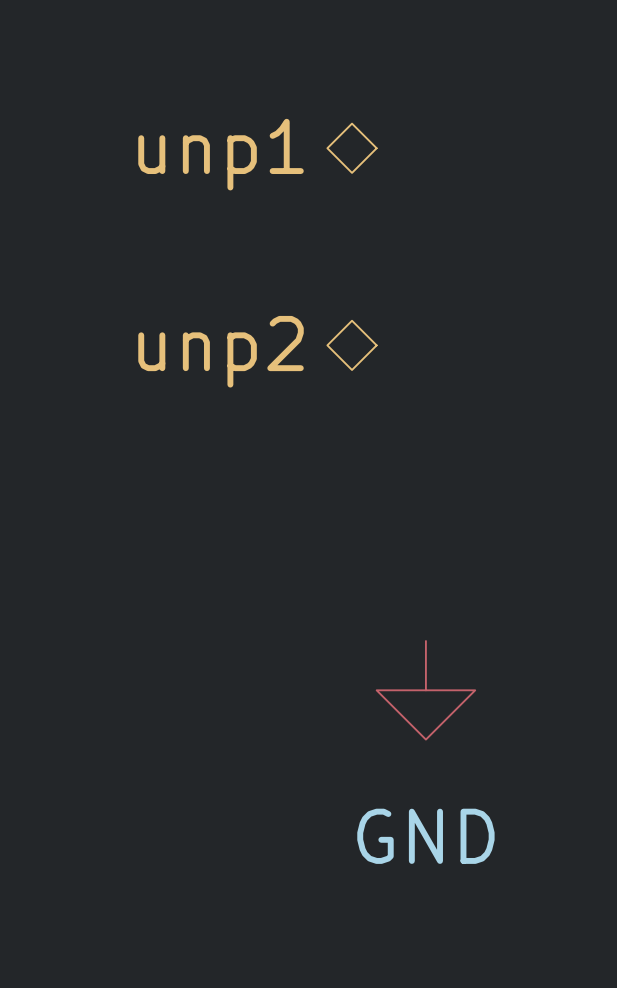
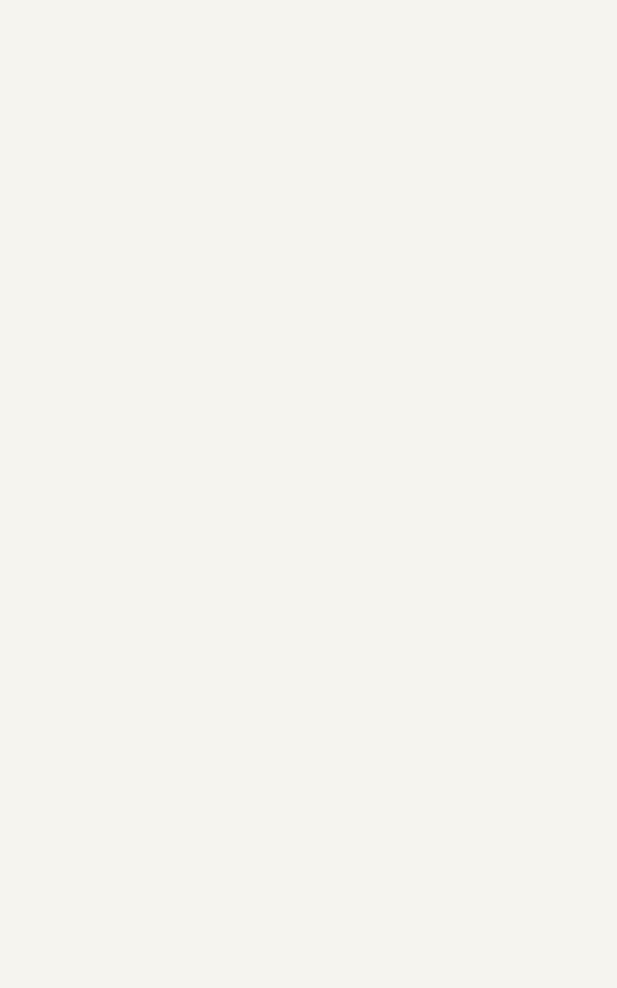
hierarchical label: unp1 (221, 154) -> none
hierarchical label: unp2 (221, 351) -> none
power symbol: GND (425, 690) -> none

